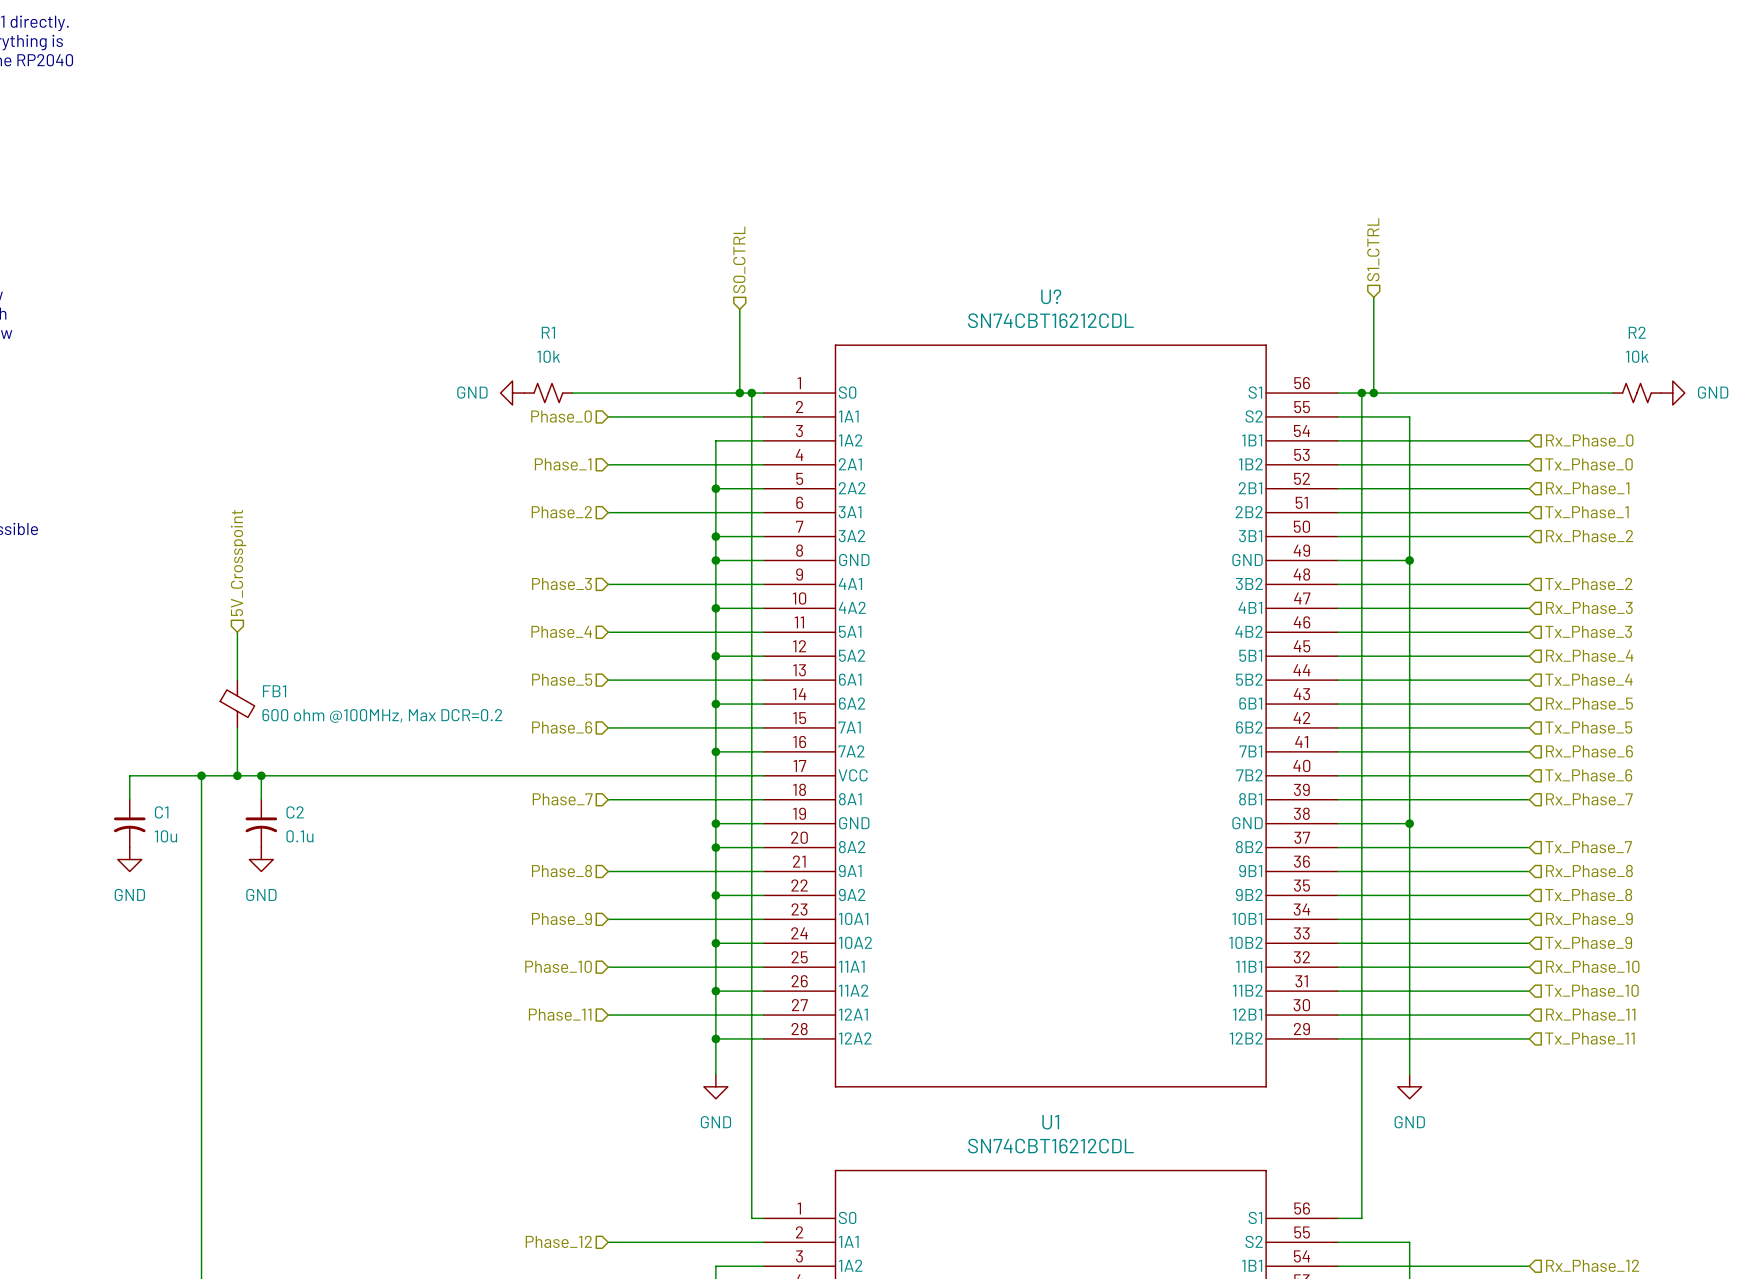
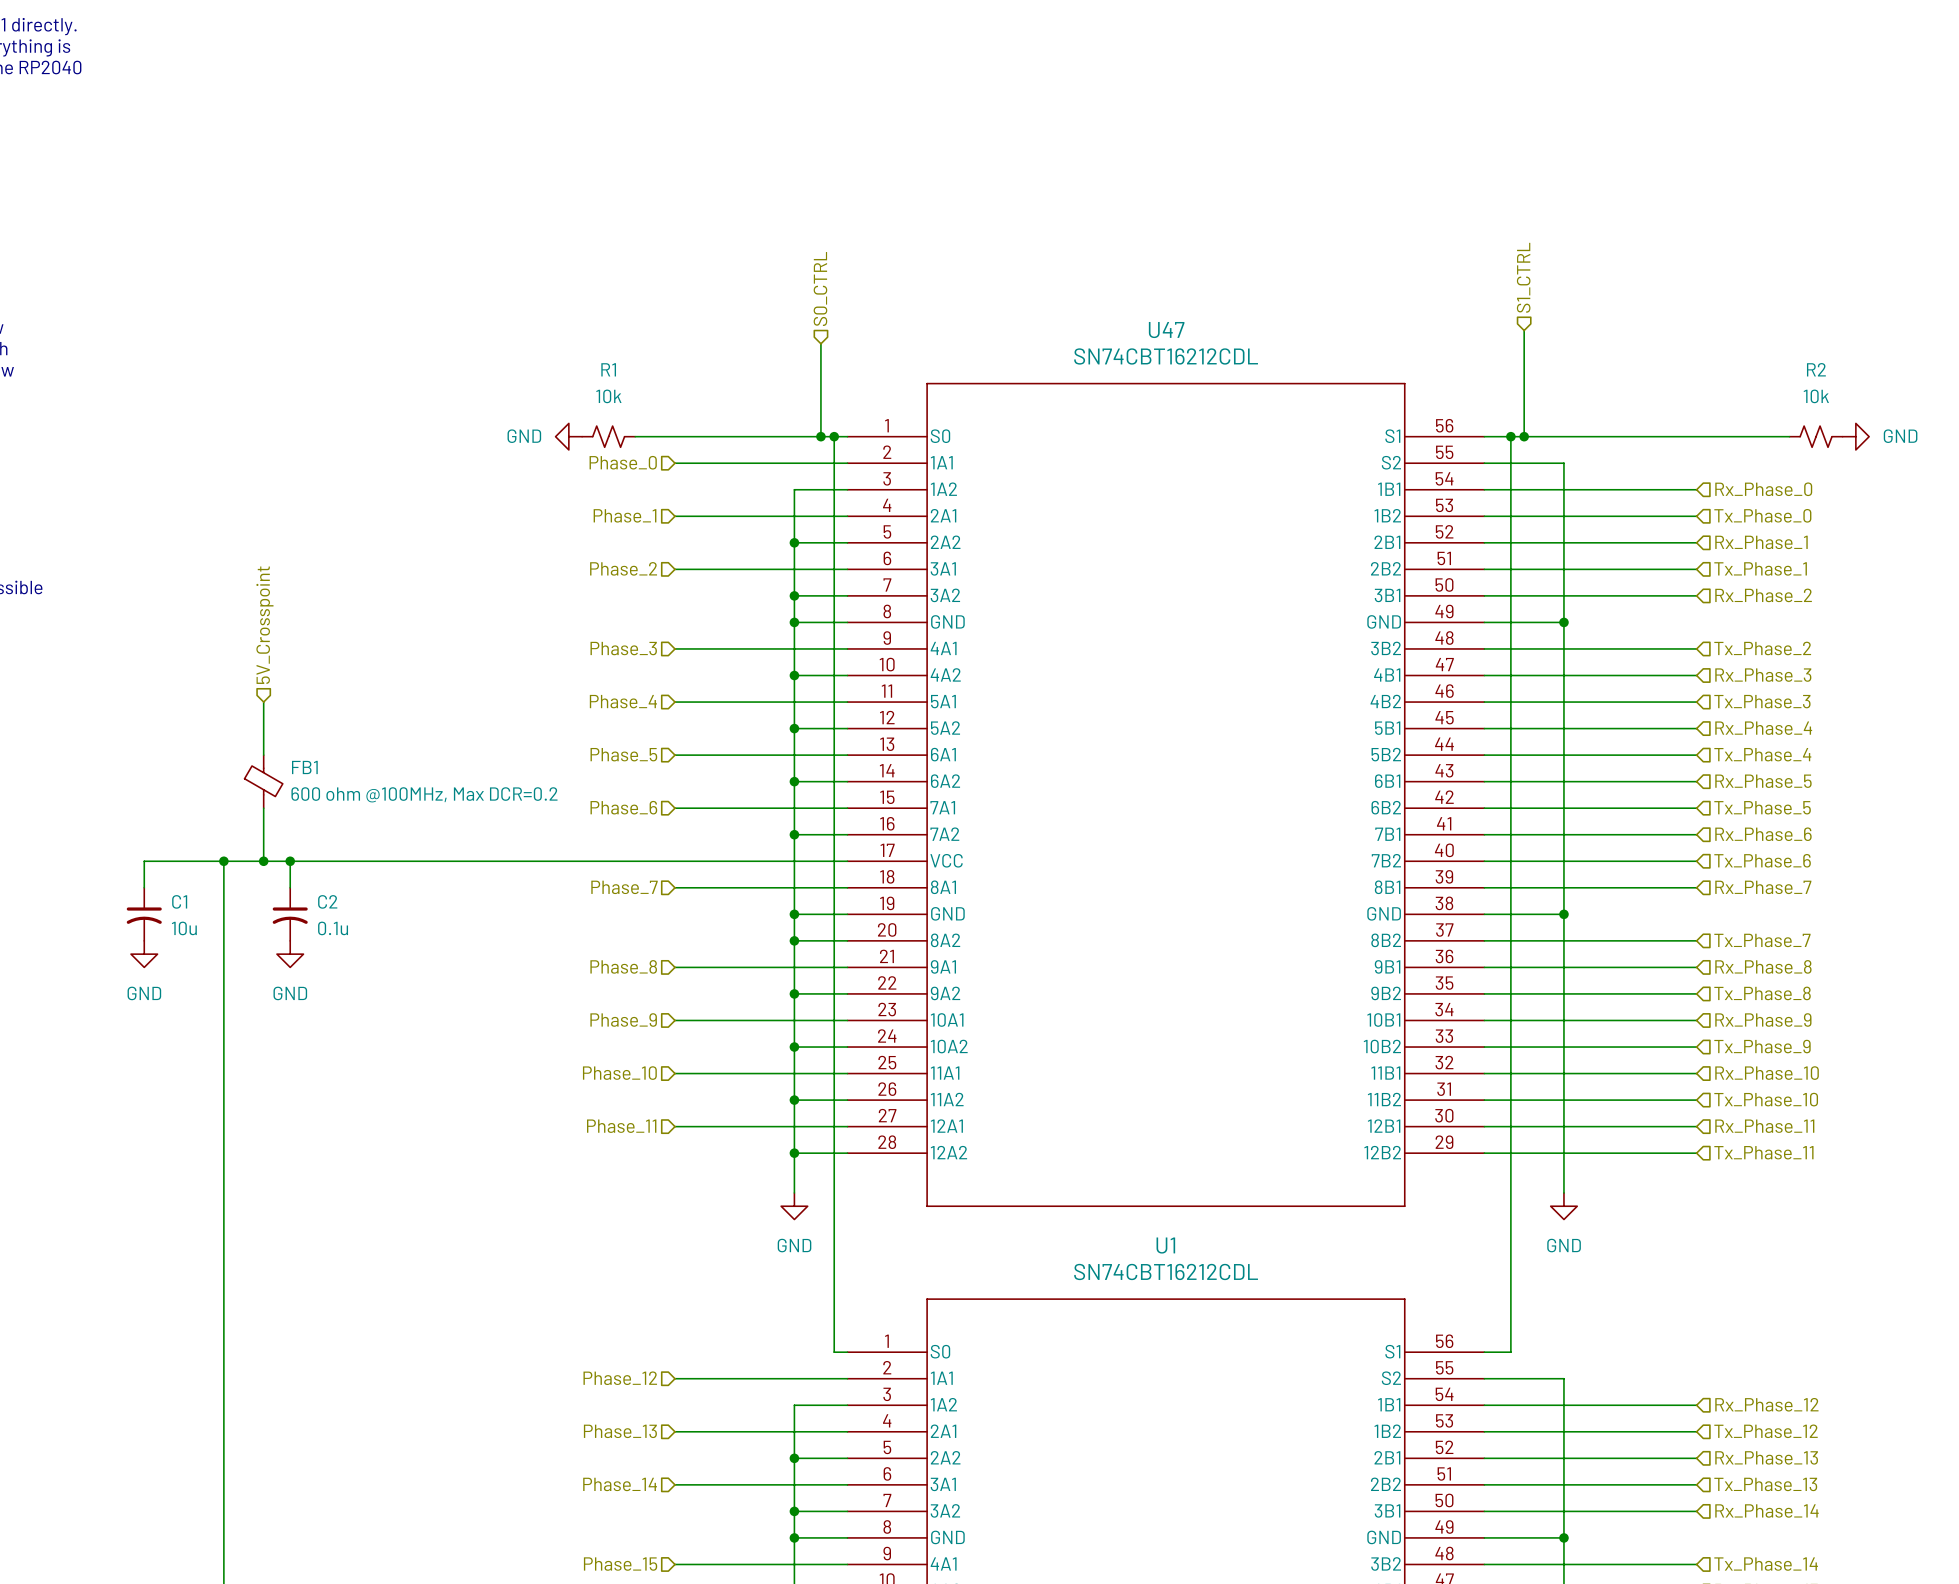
U? name: U? (1051, 296) -> U47 (1166, 330)

